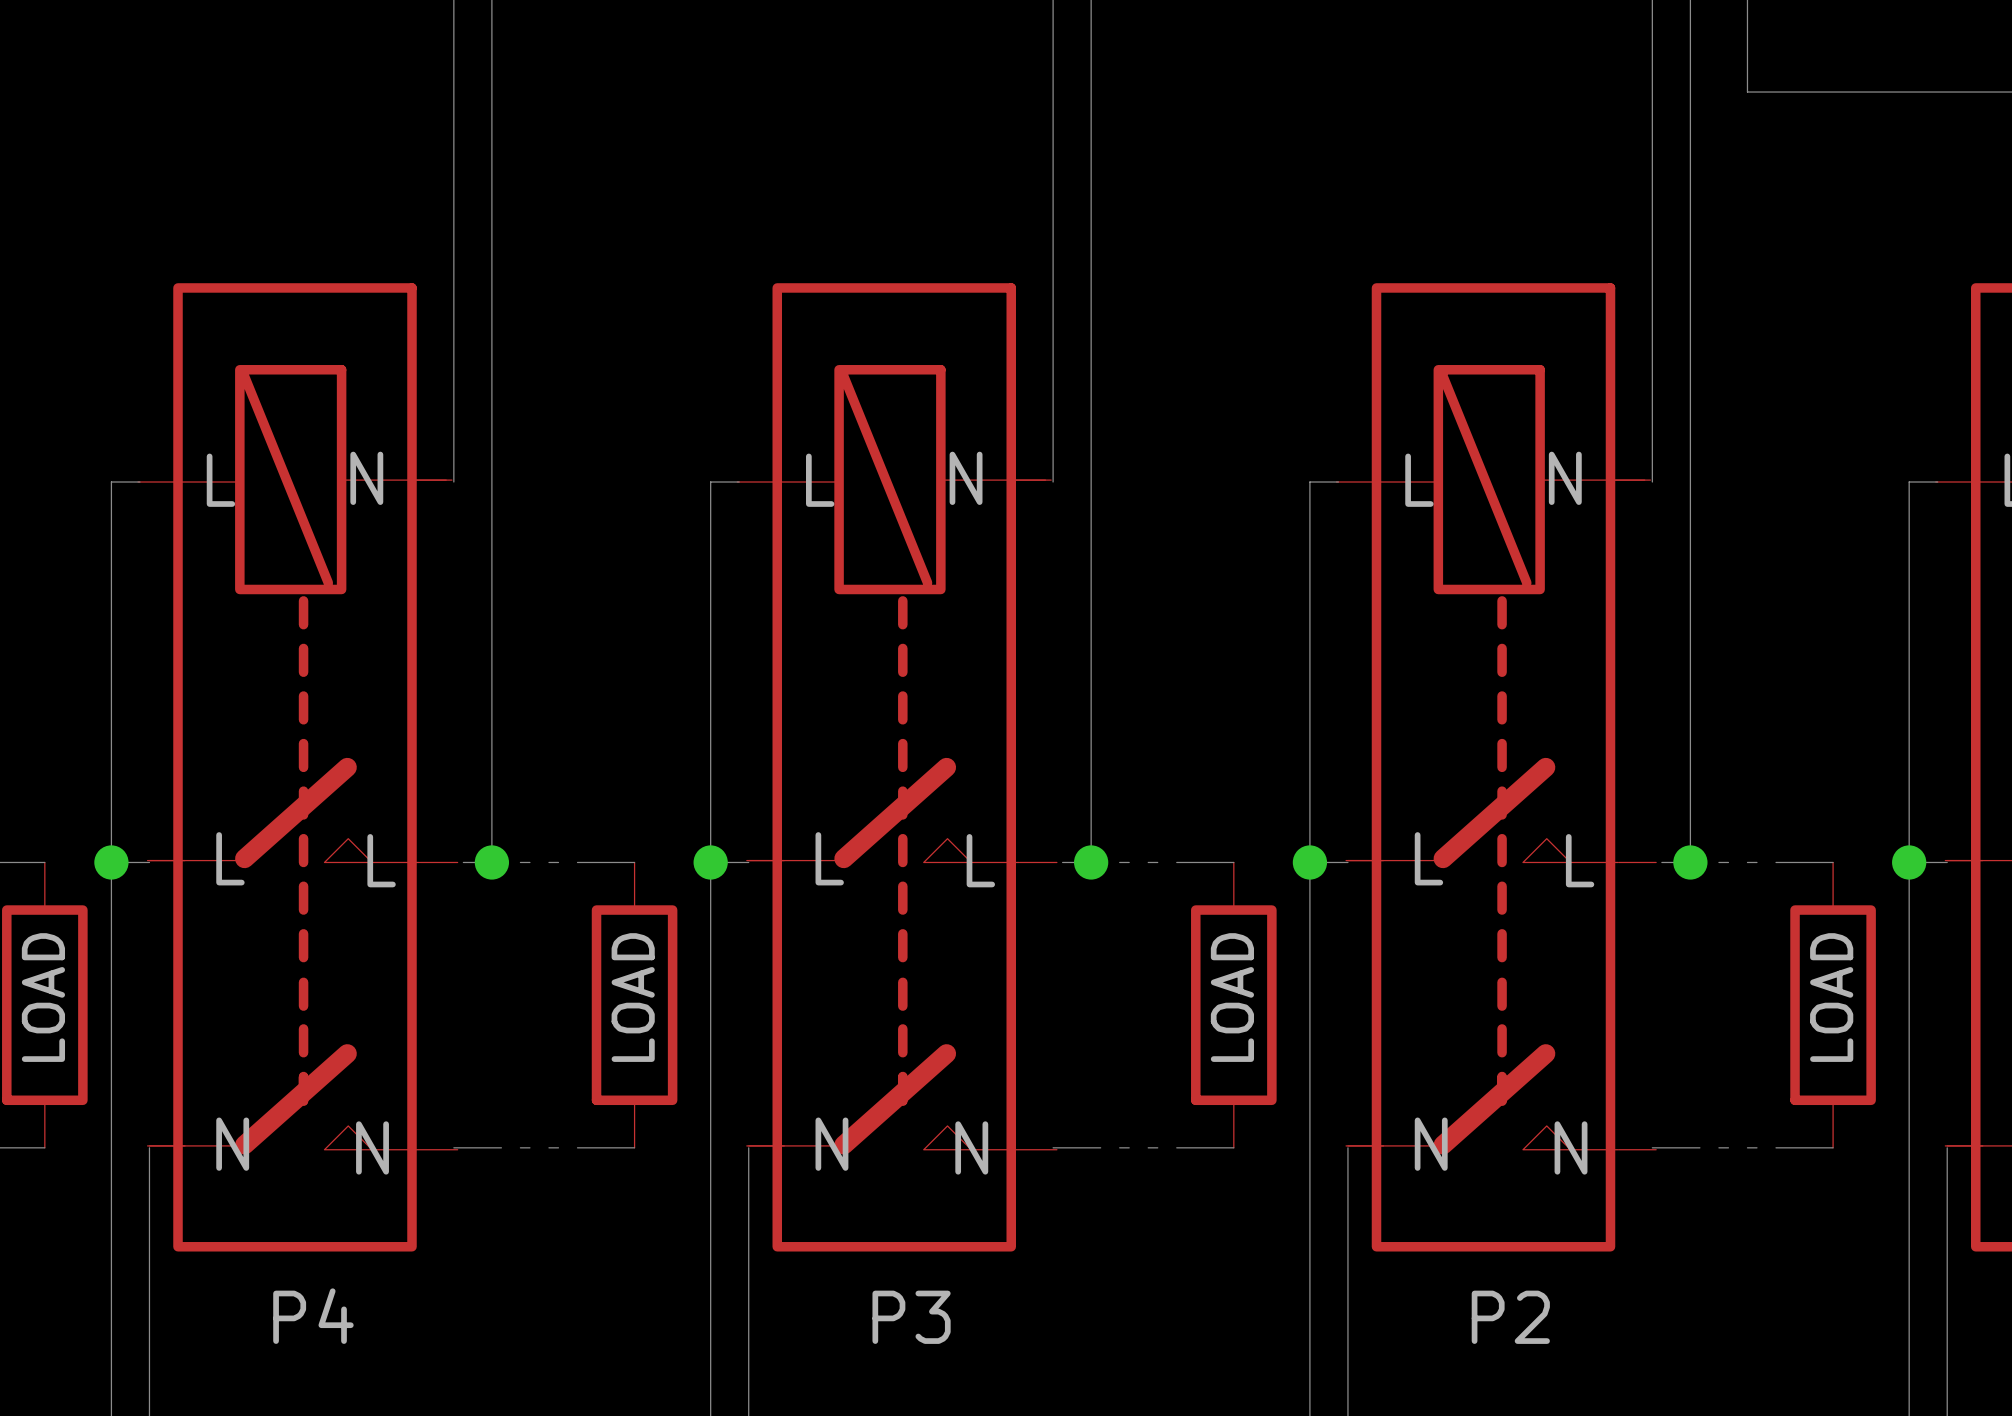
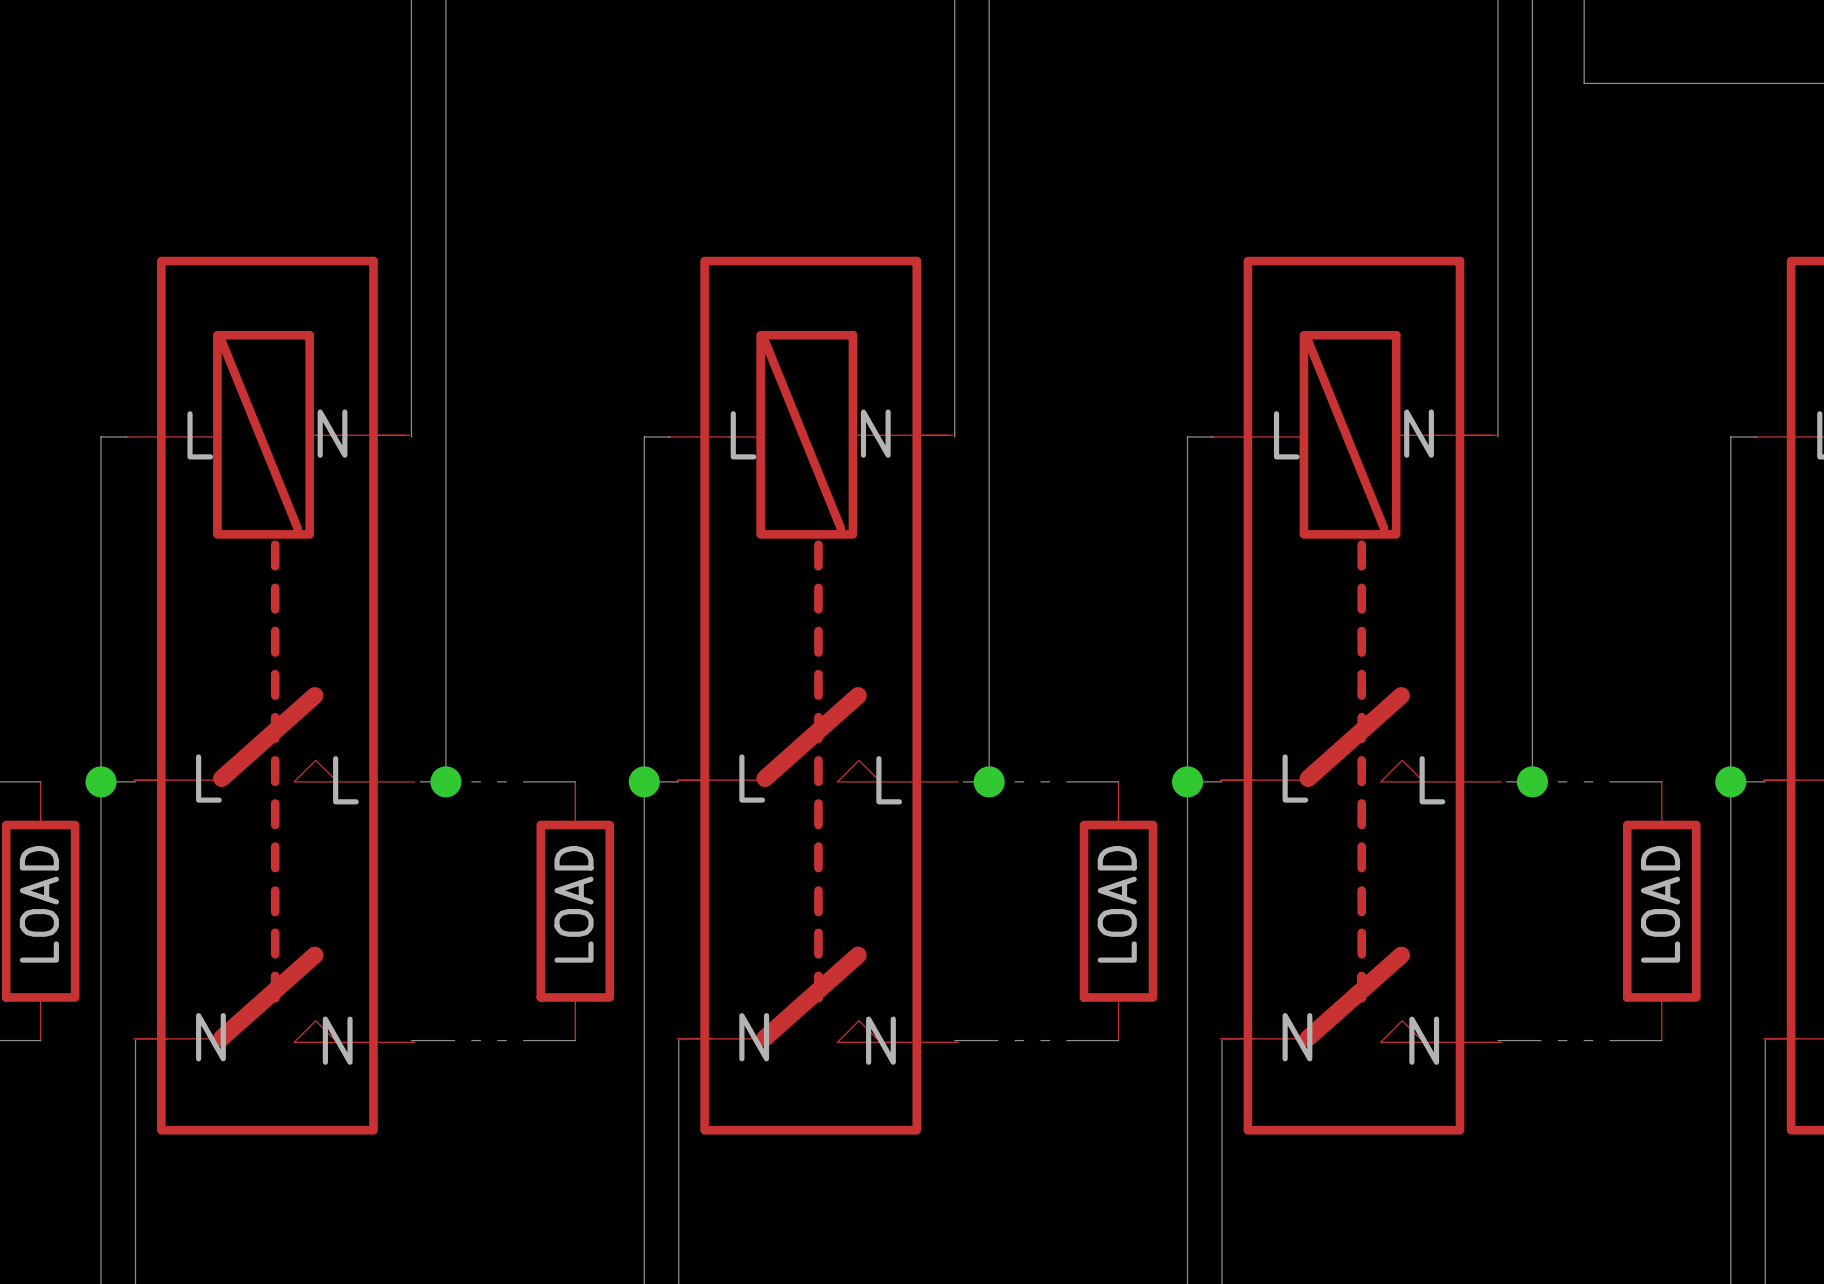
part value: P4 (313, 1316) -> none
part value: P3 (911, 1317) -> none
part value: P2 (1510, 1317) -> none

